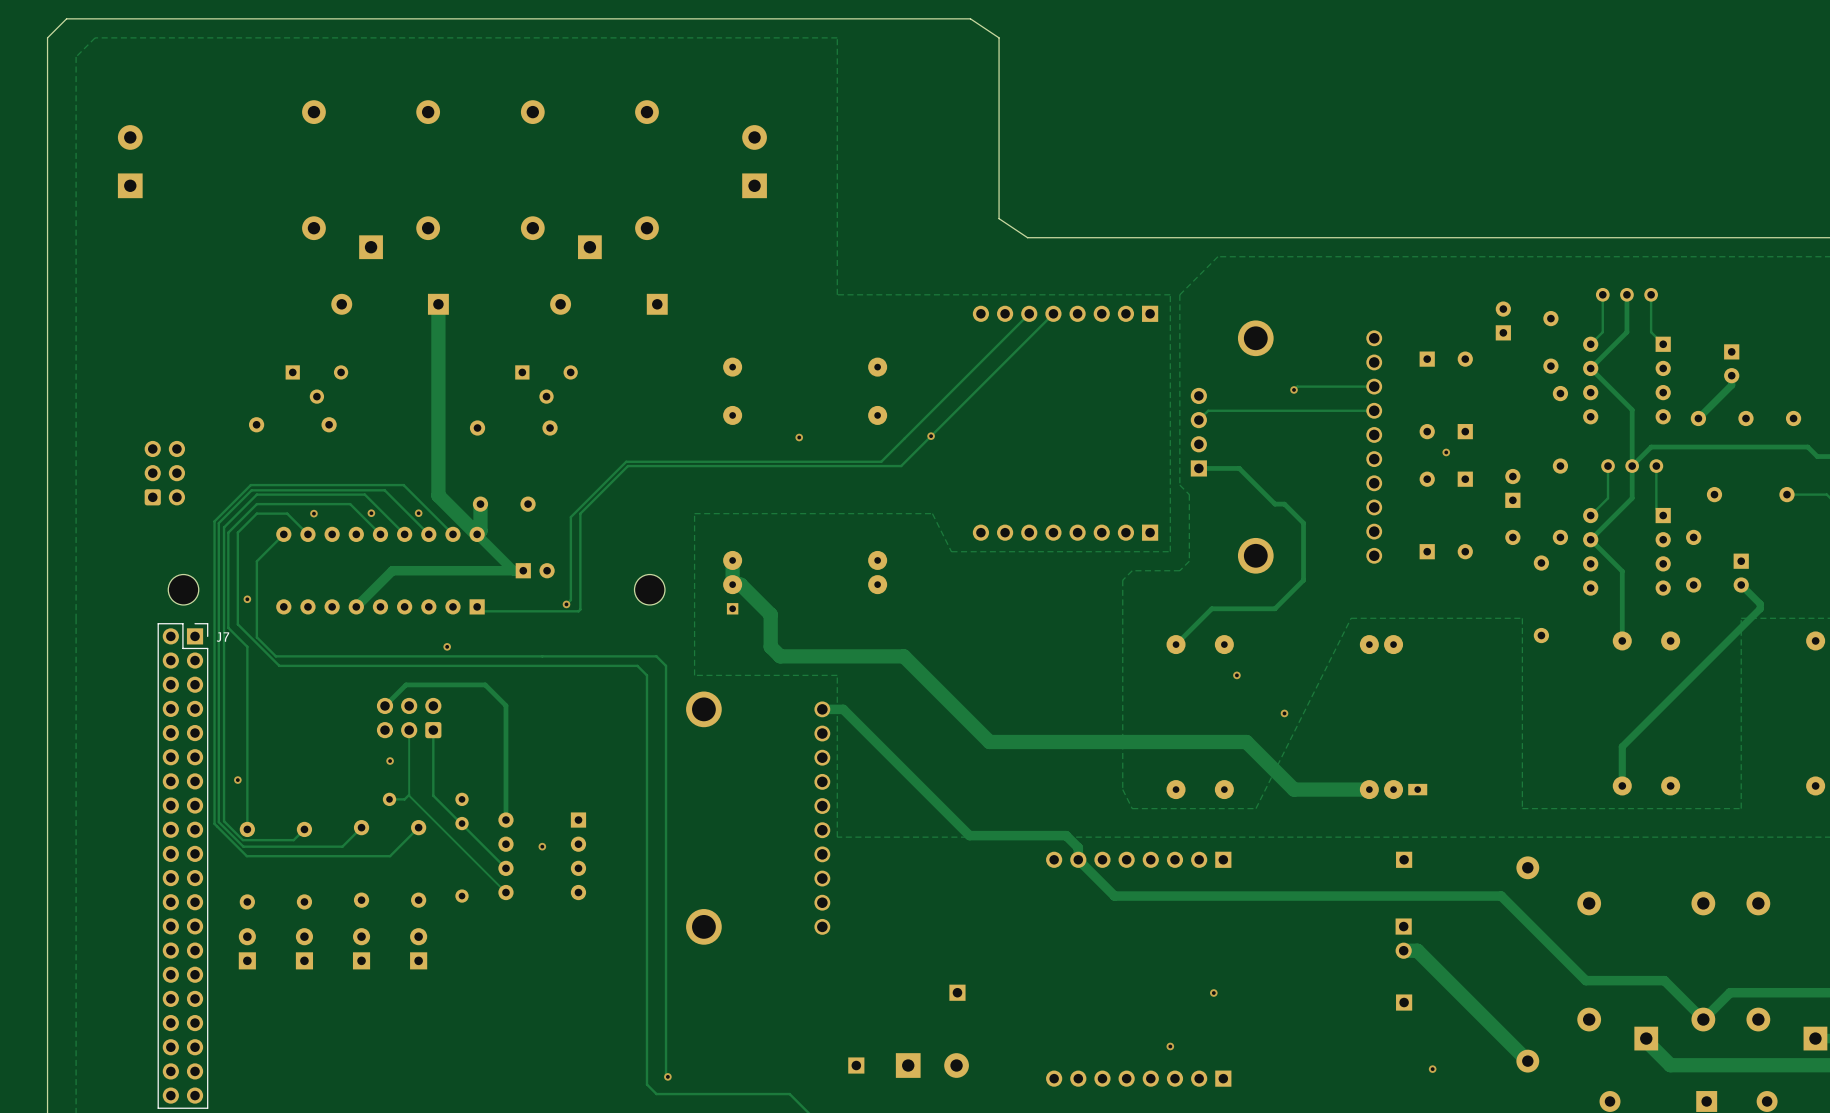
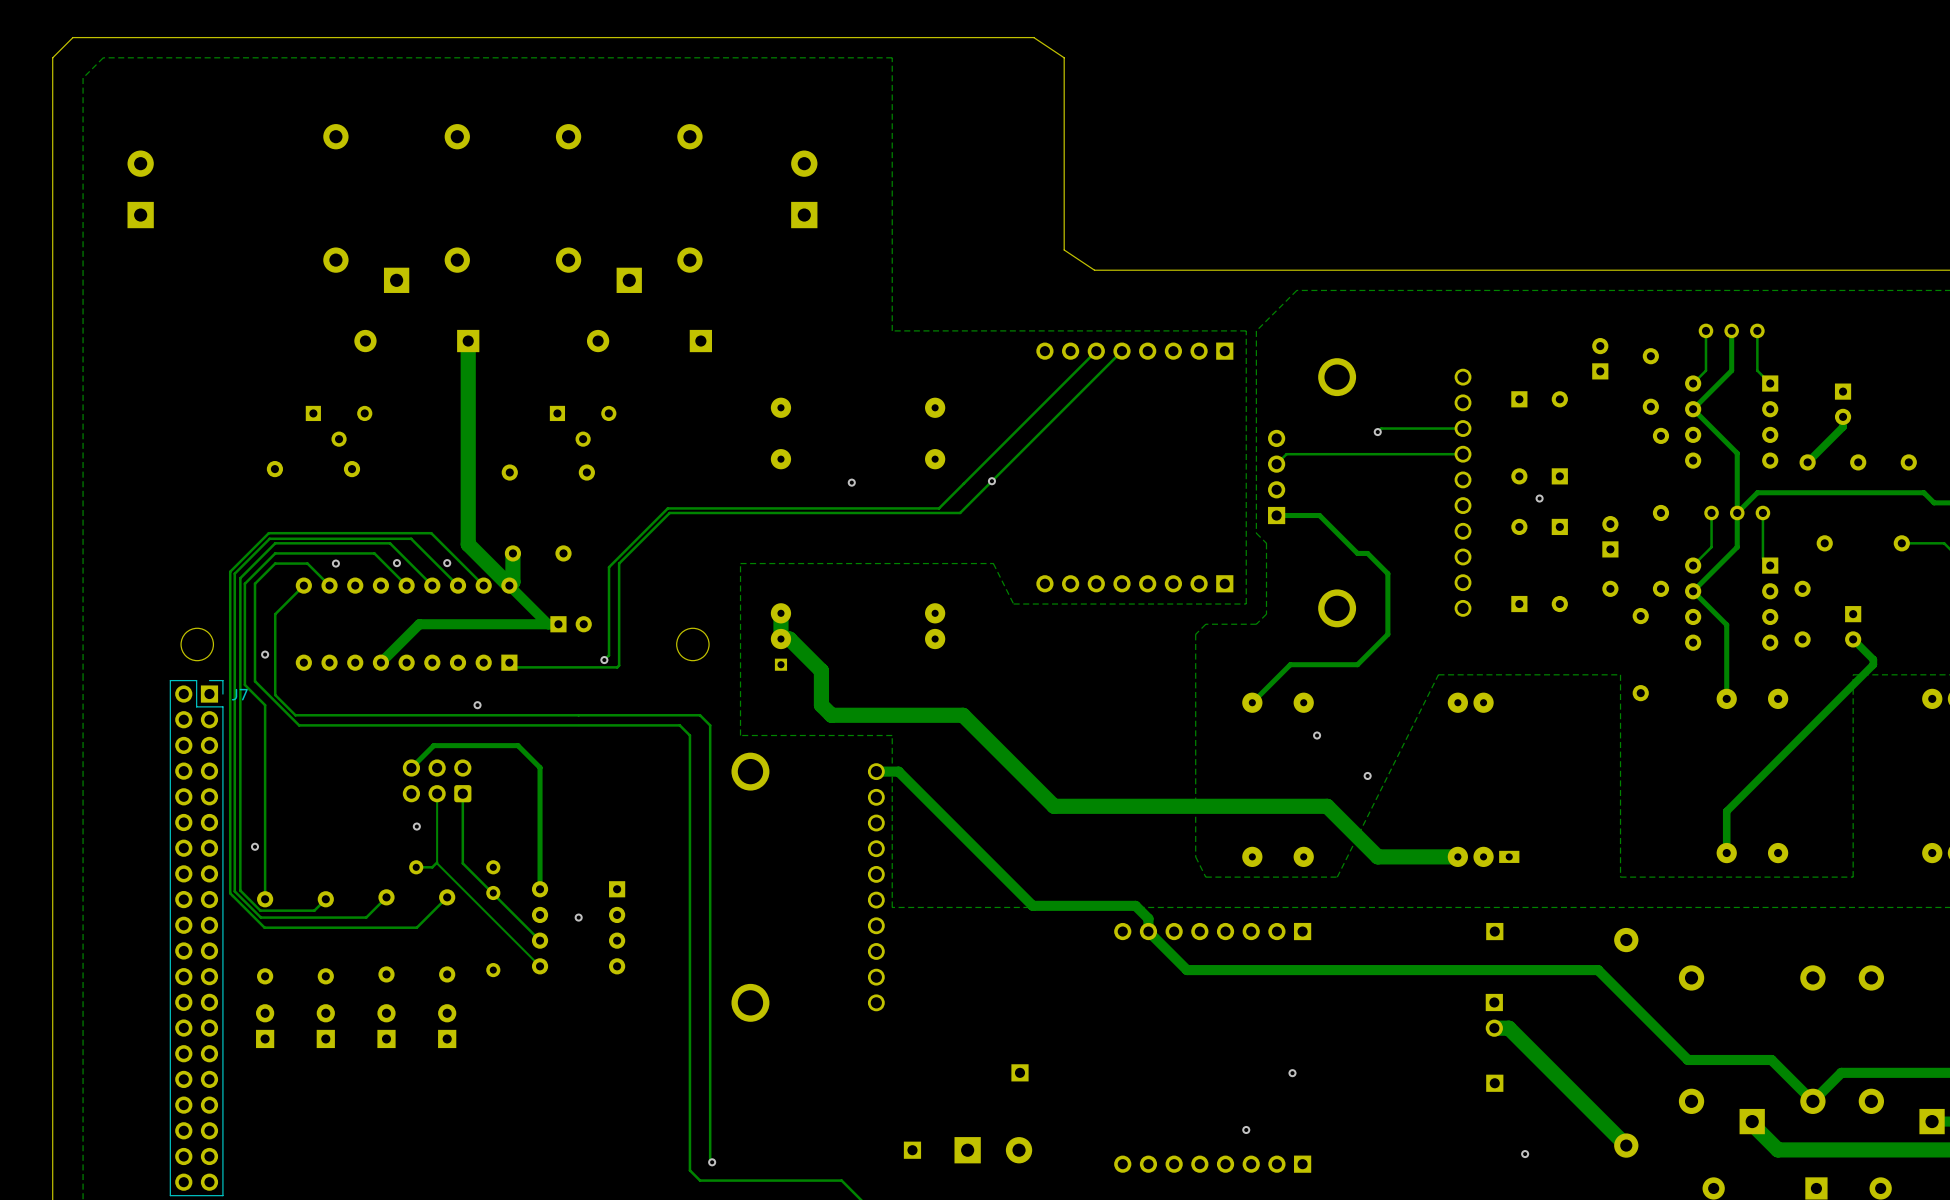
part: (164, 473) -> none

